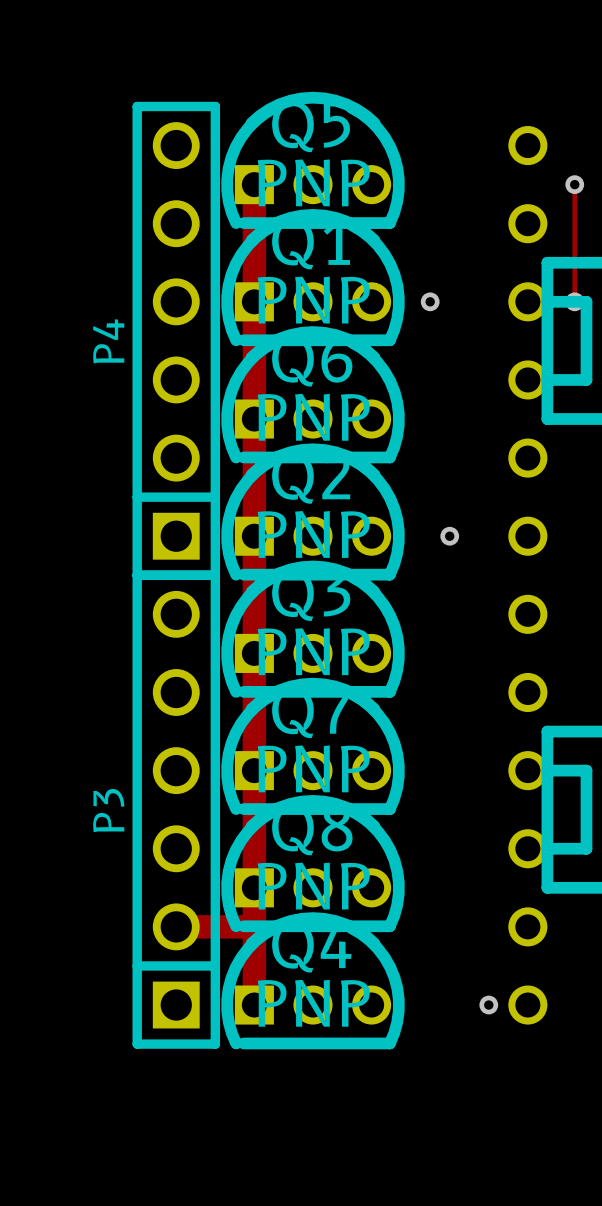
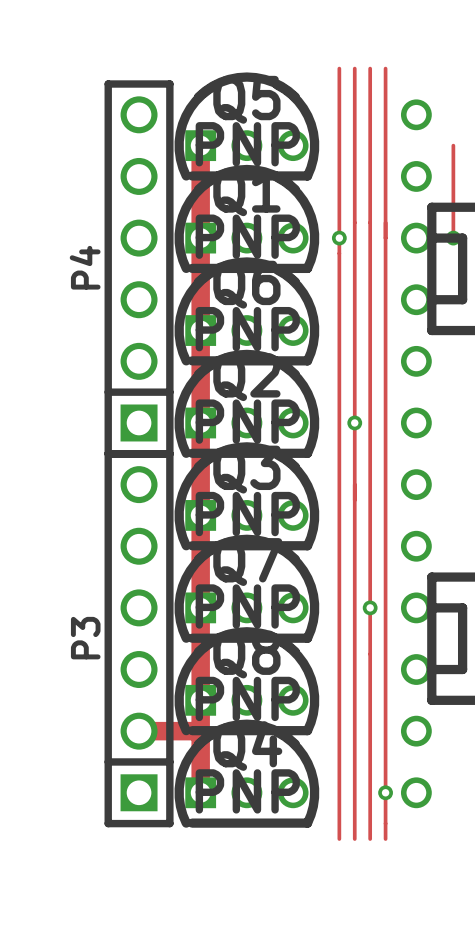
track: none -> (339, 68) (339, 839)
track: none -> (354, 68) (354, 839)
track: none -> (370, 68) (370, 839)
track: none -> (385, 68) (385, 839)
via: (574, 184) -> none
via: none -> (370, 607)

